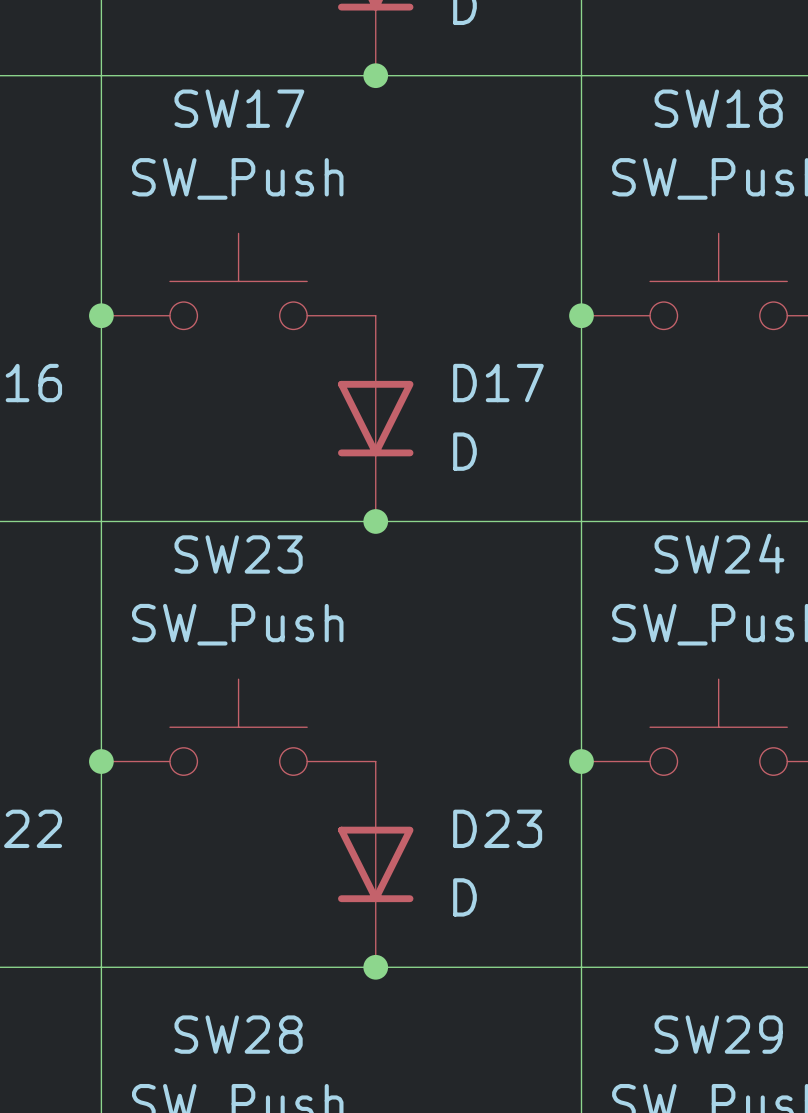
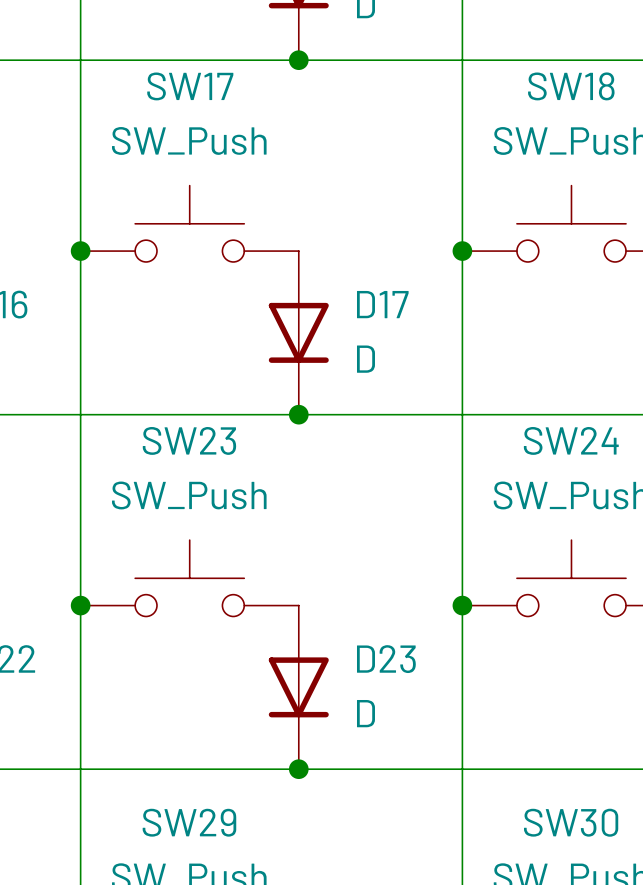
SW28 name: SW28 (238, 1034) -> SW29 (189, 822)
SW29 name: SW29 (718, 1034) -> SW30 (571, 822)

